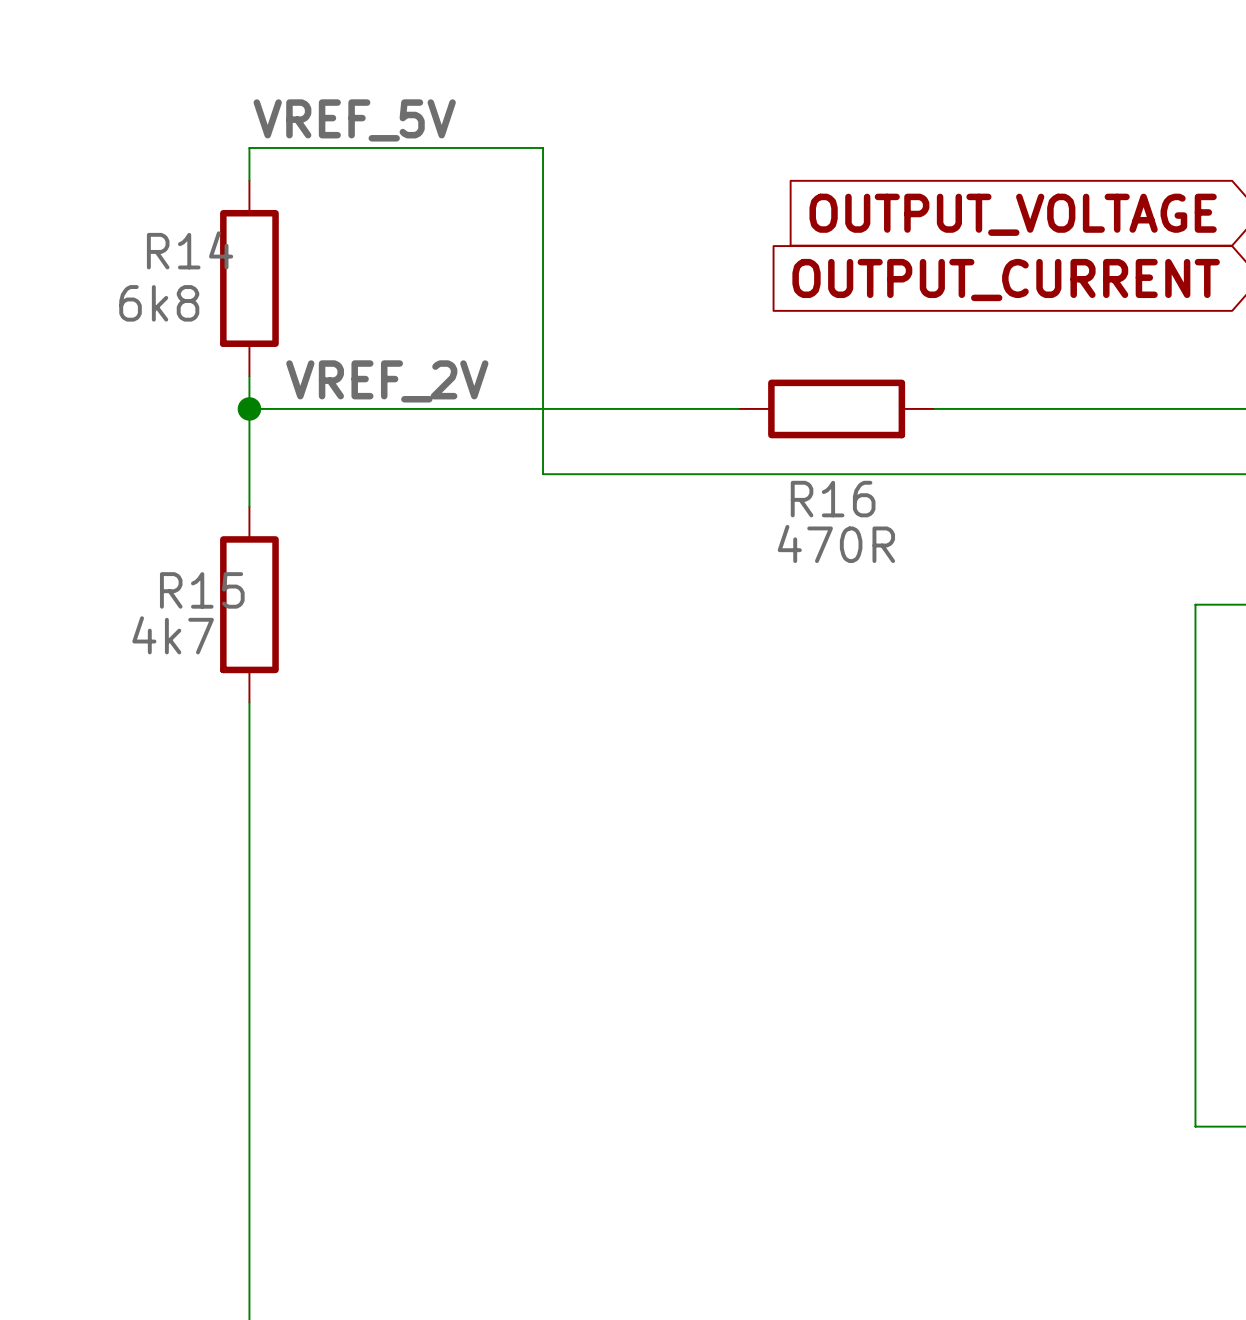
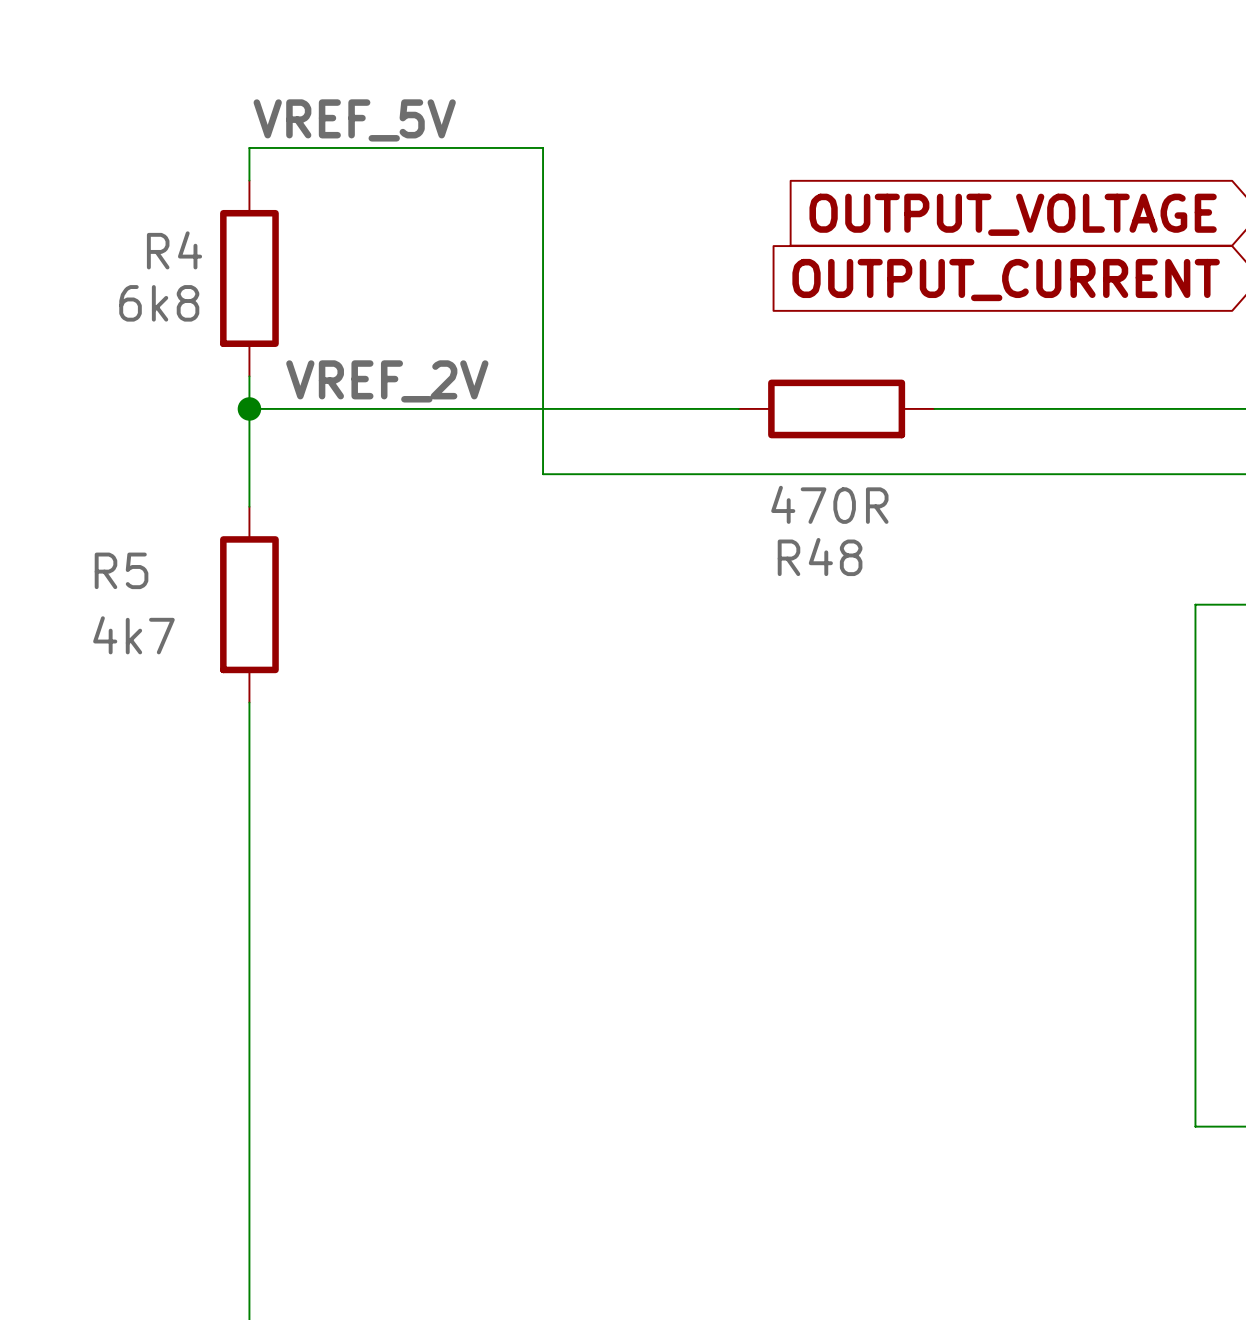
R14 name: R14 (190, 250) -> R4 (174, 250)
R16 name: R16 (833, 499) -> R48 (820, 557)
R16 value position: 470R (836, 543) -> 470R (829, 504)
R15 name: R15 (202, 590) -> R5 (121, 570)
R15 value position: 4k7 (173, 635) -> 4k7 (133, 635)

